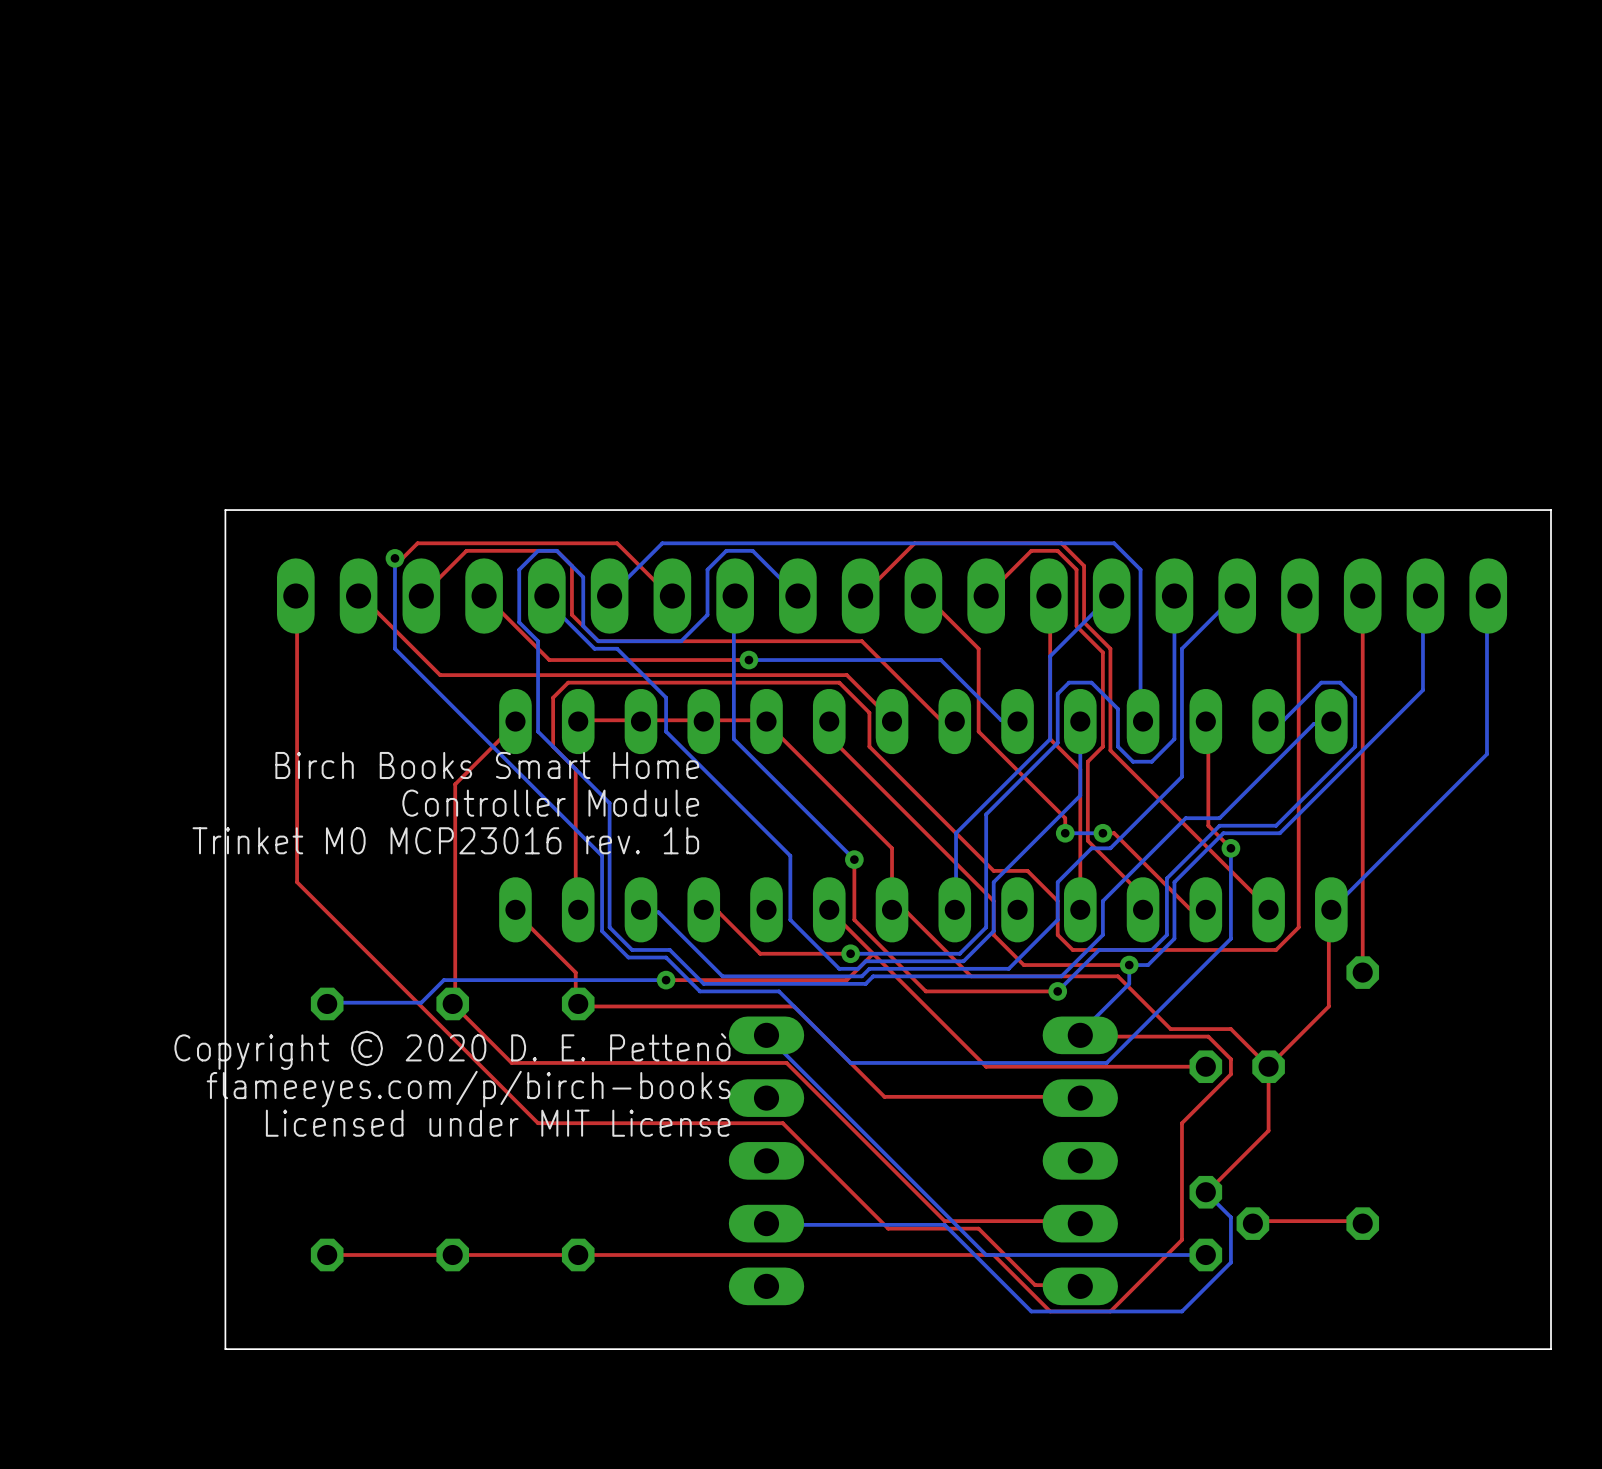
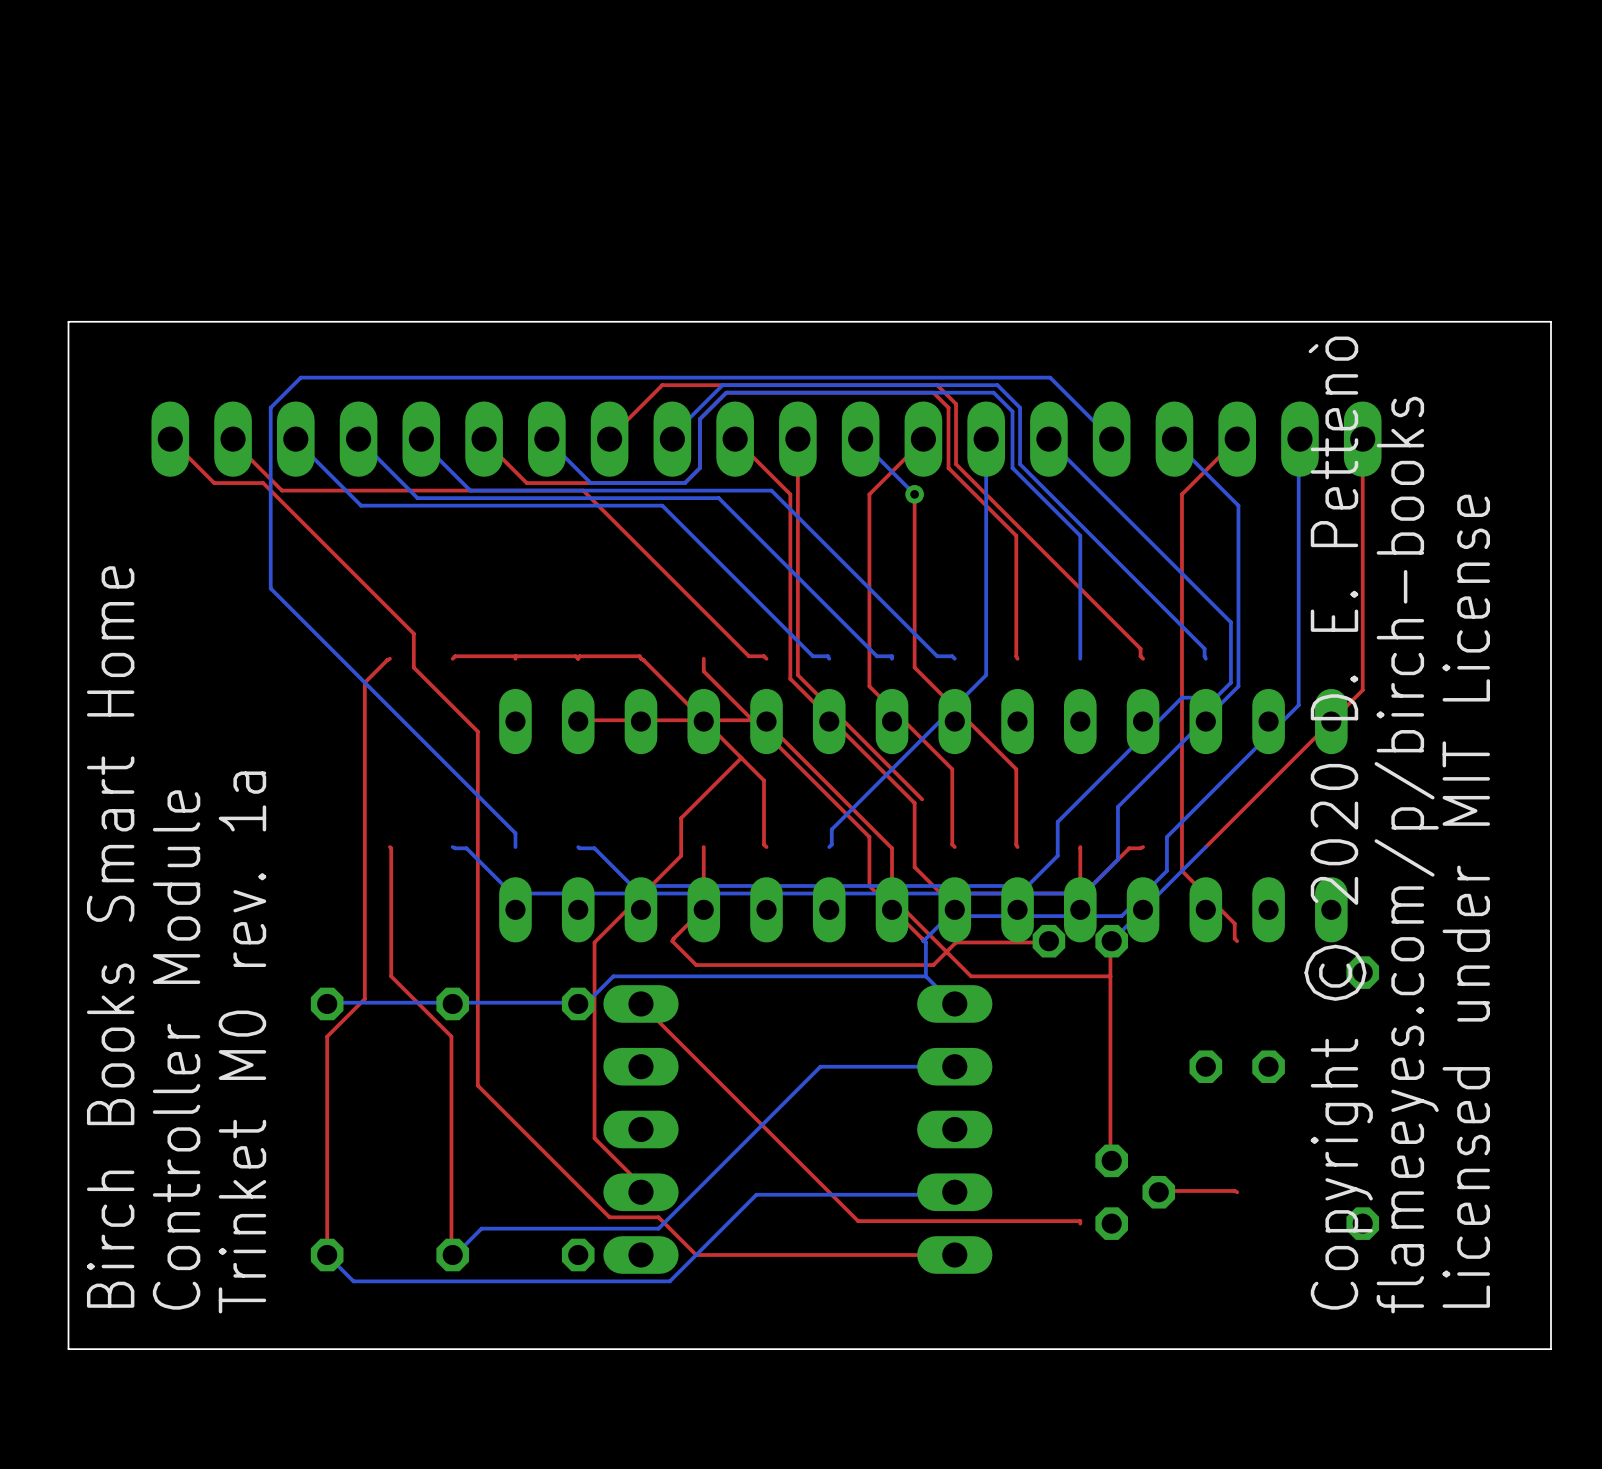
top track: none -> (233, 439) (233, 441) (282, 490) (583, 490) (748, 656) (764, 656) (766, 658)
bottom track: none -> (295, 439) (361, 505) (662, 505) (812, 656) (828, 656) (829, 658)
bottom track: none -> (358, 439) (417, 498) (718, 498) (876, 656) (892, 656) (892, 658)
bottom track: none -> (421, 439) (421, 441) (470, 490) (771, 490) (937, 656) (952, 656) (954, 658)
top track: none -> (484, 439) (526, 483) (684, 483) (699, 468) (699, 419) (726, 392) (933, 392) (948, 407) (948, 468) (1016, 535) (1017, 658)
bottom track: none -> (546, 439) (590, 483) (684, 483) (699, 468) (699, 419) (726, 392) (993, 392) (1012, 411) (1012, 468) (1080, 535) (1080, 658)
top track: none -> (609, 439) (662, 385) (937, 385) (956, 403) (956, 464) (1140, 648) (1140, 656) (1143, 658)
bottom track: none -> (672, 439) (669, 437) (722, 385) (997, 385) (1020, 407) (1020, 464) (1204, 648) (1205, 658)
top track: none -> (735, 439) (790, 494) (790, 678) (914, 803) (914, 867) (940, 893) (1084, 893) (1129, 848) (1143, 847)
bottom track: none -> (860, 439) (914, 494)
top track: none -> (923, 439) (869, 494) (869, 686) (952, 769) (952, 844) (954, 847)
bottom track: none -> (986, 439) (986, 675) (831, 829) (831, 844) (829, 847)
bottom track: none -> (1111, 439) (1050, 377) (300, 377) (270, 407) (270, 588) (515, 833) (515, 847)
bottom track: none -> (1174, 439) (1174, 441) (1238, 505) (1238, 686) (1117, 806) (1117, 859) (1084, 893) (511, 893) (466, 848) (452, 847)
top track: none -> (1237, 439) (1181, 494) (1181, 870) (1234, 923) (1234, 938) (1237, 941)
top track: none -> (1362, 439) (1362, 596)
via: none -> (914, 494)
board edge: (1551, 510) (225, 510) (225, 1349) -> (1551, 510) (1551, 321) (68, 321) (68, 1349) (225, 1349)
top track: (394, 558) (402, 558) (417, 543) (617, 543) (669, 596) (672, 596) -> none
bottom track: (394, 558) (394, 648) (594, 848) -> (578, 847) (594, 848)
via: (394, 558) -> none
top track: (295, 596) (297, 882) (391, 976) -> (389, 847) (391, 976)
top track: (358, 596) (361, 596) (440, 675) (846, 675) (892, 721) -> none
top track: (421, 596) (466, 550) (556, 550) (571, 565) (571, 614) (598, 641) (861, 641) (940, 720) (954, 721) -> none
top track: (484, 596) (549, 660) (748, 660) -> none
bottom track: (546, 596) (549, 596) (549, 603) (594, 648) (617, 648) (666, 697) (666, 731) (790, 855) (790, 919) (839, 968) (858, 968) (865, 961) (963, 961) (993, 931) (993, 882) (1080, 795) (1080, 721) -> none
bottom track: (609, 596) (662, 543) (1114, 543) (1140, 569) (1140, 720) (1143, 721) -> none
bottom track: (735, 596) (733, 739) (854, 859) -> none
bottom track: (797, 596) (752, 550) (726, 550) (707, 569) (707, 614) (681, 641) (598, 641) (583, 626) (583, 577) (556, 550) (538, 550) (519, 569) (519, 622) (538, 641) (538, 731) (609, 803) (609, 927) (632, 949) (669, 949) (703, 983) (865, 983) (873, 976) -> (861, 976) (873, 976)
top track: (860, 596) (914, 543) (1061, 543) (1084, 565) (1084, 622) (1110, 648) (1110, 750) (1268, 909) -> none
part position: (892, 596) -> (766, 439)
top track: (923, 596) (925, 596) (978, 648) (978, 731) -> (914, 494) (914, 667) (978, 731)
top track: (986, 596) (1031, 550) (1057, 550) (1076, 569) (1076, 626) (1102, 652) (1102, 746) (1087, 761) (1087, 840) (1140, 893) (1140, 908) (1143, 909) -> none
top track: (1048, 596) (1050, 739) (1080, 769) (1080, 847) -> none
bottom track: (1111, 596) (1050, 656) (1050, 739) (956, 833) (954, 909) -> none
bottom track: (1174, 596) (1174, 739) (1151, 761) (1133, 761) (1117, 746) (1117, 708) (1091, 682) (1069, 682) (1057, 693) (1057, 742) (986, 814) (986, 927) (959, 953) (850, 953) -> none
bottom track: (1237, 596) (1234, 596) (1181, 648) (1181, 776) (1110, 848) (1091, 848) (1057, 882) (1057, 919) (1008, 968) (869, 968) (861, 976) -> none
top track: (1299, 596) (1298, 927) (1276, 949) (1072, 949) (1057, 934) (1057, 901) (1027, 870) (993, 870) (922, 799) -> none
bottom track: (1425, 596) (1422, 596) (1422, 690) (1279, 833) (1223, 833) (1174, 882) (1174, 938) (1148, 965) (1129, 965) (1129, 983) (1080, 1032) (1080, 1035) -> none
bottom track: (1488, 596) (1486, 754) (1331, 909) -> none
top track: none -> (515, 656) (515, 658)
top track: none -> (389, 658) (364, 682) (364, 998) (327, 1036) (327, 1255)
top track: none -> (452, 658) (455, 656) (575, 656) (578, 658) (579, 656) (639, 656) (764, 780) (764, 844) (766, 847)
top track: none -> (703, 658) (703, 671) (869, 837) (869, 885) (923, 941)
bottom track: (748, 660) (940, 660) (1001, 720) (1017, 721) -> none
via: (748, 660) -> none
top track: (1362, 690) (1362, 972) -> (1362, 690) (1205, 847)
bottom track: (1298, 705) (1321, 682) (1340, 682) (1355, 697) (1355, 746) (1276, 825) (1219, 825) (1166, 878) (1166, 934) (1151, 949) (1099, 949) (1057, 991) -> (1298, 705) (1299, 439)
top track: (515, 721) (515, 724) (455, 784) (455, 1002) (452, 1003) (511, 1062) (786, 1062) (944, 1221) -> (640, 1003) (858, 1221) (944, 1221)
top track: (829, 721) (831, 724) (831, 739) (993, 901) (993, 934) (1023, 965) (1129, 965) -> none
top track: (1205, 721) (1208, 724) (1208, 825) (1230, 848) -> none
bottom track: (1331, 721) (1328, 724) (1313, 724) (1219, 818) (1185, 818) -> (1283, 720) (1185, 818)
top track: (869, 746) (869, 712) (839, 682) (568, 682) (553, 697) (553, 746) (575, 769) (575, 908) (578, 909) -> (869, 746) (797, 675) (797, 439)
top track: none -> (741, 757) (681, 818) (681, 855) (594, 942) (594, 1138) (639, 1183) (640, 1192)
text: Birch Books Smart Home (487, 765) -> none
top track: (1016, 769) (1065, 818) (1065, 833) -> (1016, 769) (1017, 847)
text: Controller Module (550, 803) -> none
text: none -> Copyright © 2020 D. E. Pettenò (1338, 823)
via: (1065, 833) -> none
top track: (1102, 833) (1114, 833) (1189, 908) (1205, 909) -> none
bottom track: (1102, 833) (1065, 833) -> none
via: (1102, 833) -> none
bottom track: (1166, 837) (1102, 901) (1102, 934) (1061, 976) (925, 976) -> (1166, 837) (1166, 870) (1121, 916) (948, 916) (923, 941) (925, 942) (925, 976) (954, 1003)
text: Trinket M0 MCP23016 rev. 1b (445, 840) -> none
top track: none -> (703, 847) (703, 908) (672, 941) (696, 965) (933, 965) (956, 942) (1048, 941)
bottom track: none -> (1205, 847) (1111, 941)
bottom track: (1230, 848) (1230, 938) (1106, 1062) (850, 1062) (779, 991) (699, 991) (666, 957) (628, 957) (602, 931) (602, 855) -> (1048, 439) (1230, 622) (1230, 682) (1215, 697) (1181, 697) (1057, 821) (1057, 855) (1027, 885) (632, 885) (602, 855)
via: (1230, 848) -> none
text: none -> flameeyes.com/p/birch-books (1406, 855)
top track: (854, 859) (854, 919) (925, 991) (1057, 991) -> none
via: (854, 859) -> none
text: none -> Licensed under MIT License (1466, 901)
top track: (515, 909) (515, 912) (575, 972) (575, 1002) (579, 1006) (794, 1006) (884, 1096) (1080, 1098) -> none
bottom track: (640, 909) (643, 912) (658, 912) (722, 976) -> none
top track: (703, 909) (703, 912) (718, 912) (760, 953) (850, 953) -> none
top track: (829, 909) (986, 1066) (1205, 1066) -> none
top track: (1331, 909) (1328, 912) (1328, 1006) (1268, 1066) -> none
text: none -> Birch Books Smart Home (110, 937)
part: none -> (1080, 941)
top track: none -> (1111, 941) (1111, 1160)
via: (850, 953) -> none
top track: (873, 953) (846, 980) (666, 980) -> none
via: (1129, 965) -> none
top track: (1110, 976) (1117, 976) (1170, 1029) (1230, 1029) (1268, 1066) -> none
bottom track: (666, 980) (443, 980) (421, 1002) -> (722, 976) (613, 976) (587, 1002) (421, 1002)
via: (666, 980) -> none
via: (1057, 991) -> none
bottom track: (766, 1035) (986, 1255) (1205, 1255) -> none
top track: (1080, 1035) (1208, 1036) (1230, 1059) (1230, 1074) (1181, 1123) (1181, 1239) (1110, 1311) (1050, 1311) (993, 1255) (954, 1255) -> none
top track: (451, 1036) (538, 1123) (782, 1123) (888, 1228) (978, 1228) (1035, 1285) (1080, 1286) -> none
text: none -> Trinket M0 rev. 1a (242, 1042)
text: none -> Controller Module (176, 1049)
text: Copyright © 2020 D. E. Pettenò (452, 1050) -> none
bottom track: none -> (954, 1066) (820, 1066) (658, 1228) (481, 1228) (455, 1255) (452, 1255)
top track: (1268, 1066) (1268, 1130) (1205, 1192) -> none
text: flameeyes.com/p/birch-books (468, 1089) -> none
text: Licensed under MIT License (498, 1123) -> none
part: none -> (640, 1129)
part: none -> (954, 1129)
part: (766, 1160) -> none
part: (1080, 1160) -> none
bottom track: none -> (954, 1192) (952, 1194) (756, 1194) (669, 1281) (353, 1281) (327, 1255)
bottom track: (1205, 1192) (1230, 1217) (1230, 1262) (1181, 1311) (1031, 1311) (944, 1224) (766, 1223) -> none
top track: none -> (1237, 1192) (1158, 1192)
part position: (1229, 1223) -> (1135, 1192)
top track: (1362, 1223) (1362, 1221) (1253, 1221) (1252, 1223) -> none
top track: (451, 1255) (327, 1255) -> (451, 1255) (451, 1036)
top track: (696, 1255) (452, 1255) -> (696, 1255) (658, 1217) (609, 1217) (477, 1085) (477, 731) (413, 667) (413, 633) (263, 483) (214, 483) (170, 439)

